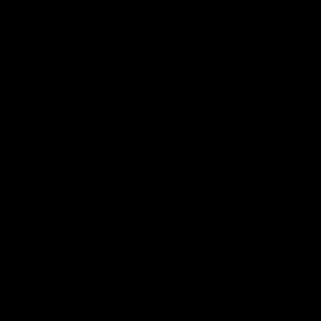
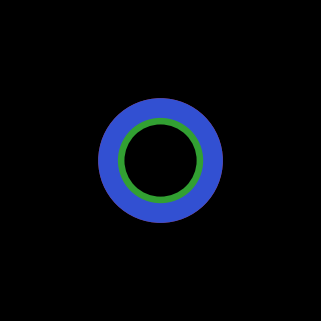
part: none -> (160, 160)

